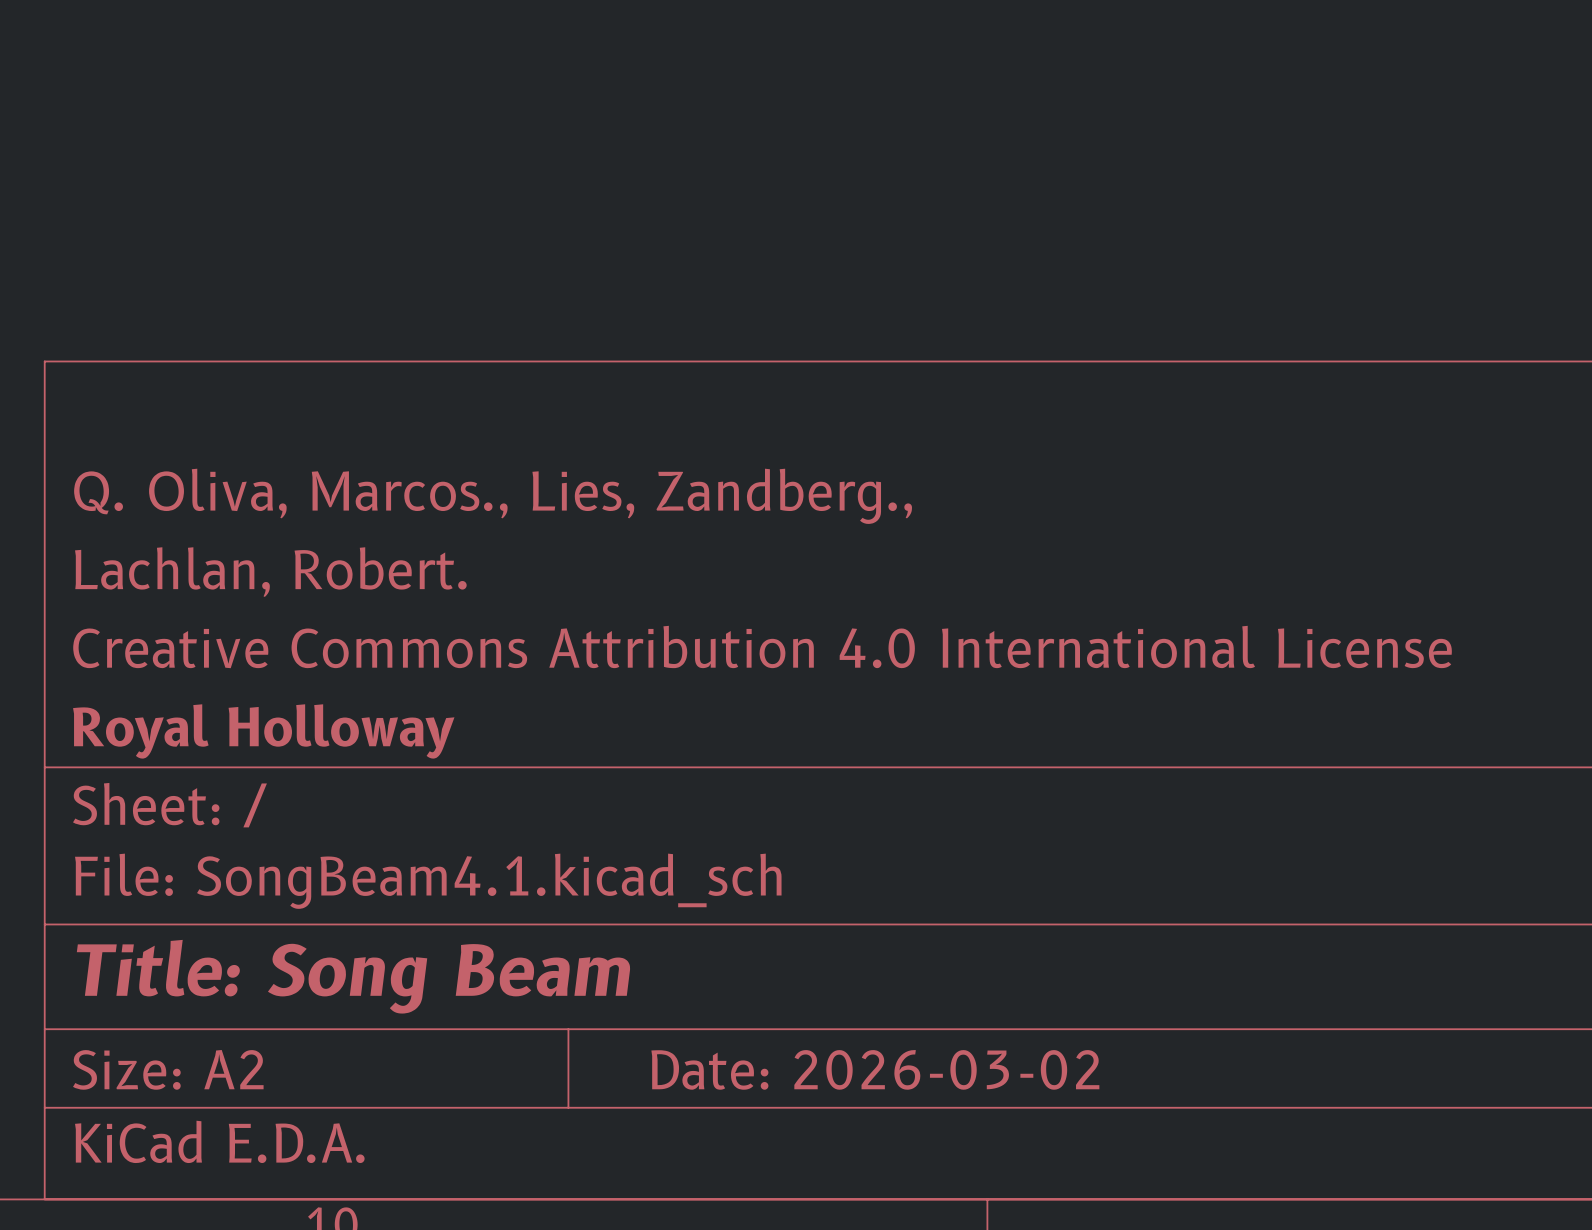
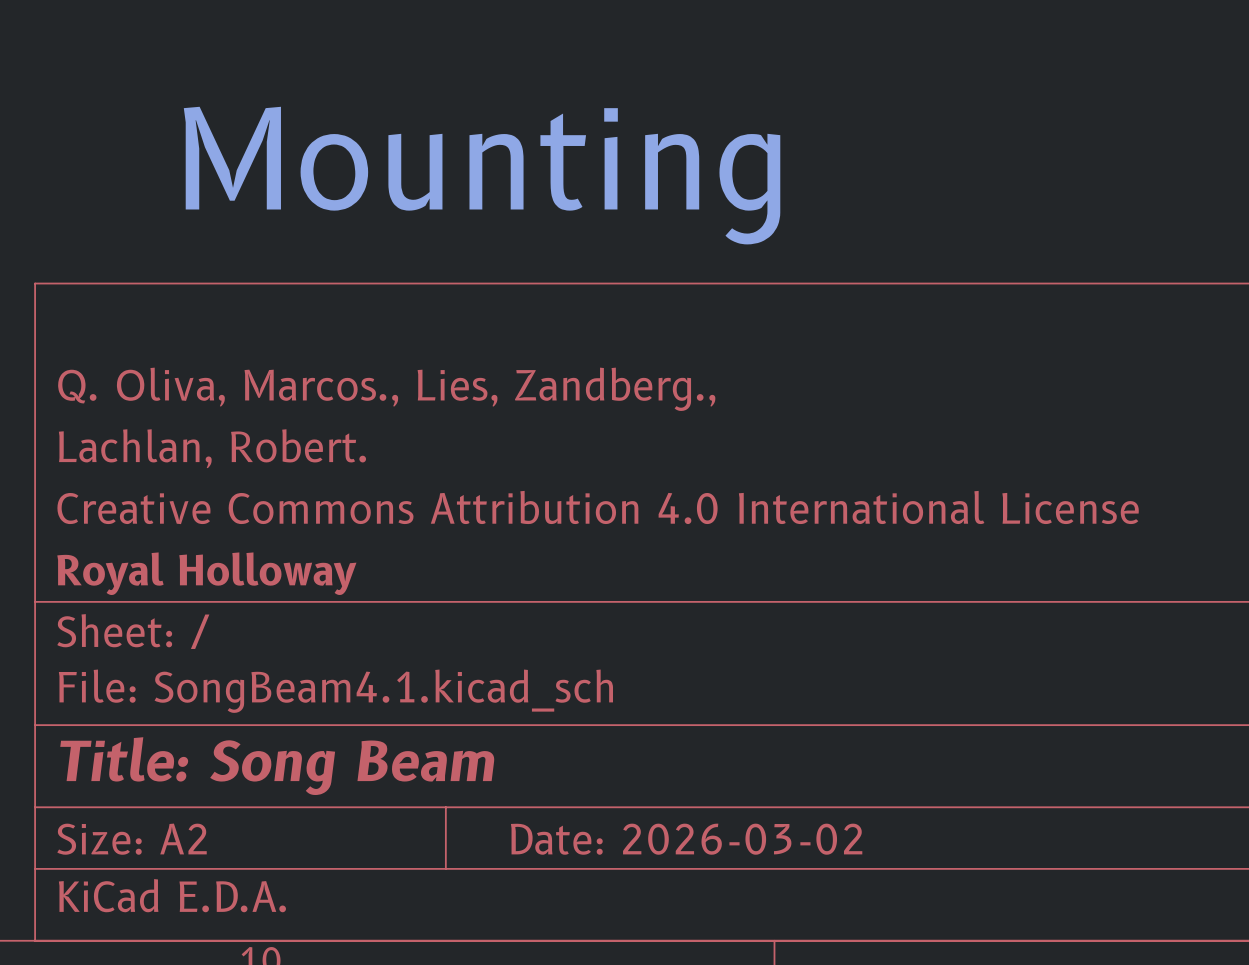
text: none -> Mounting (482, 175)

